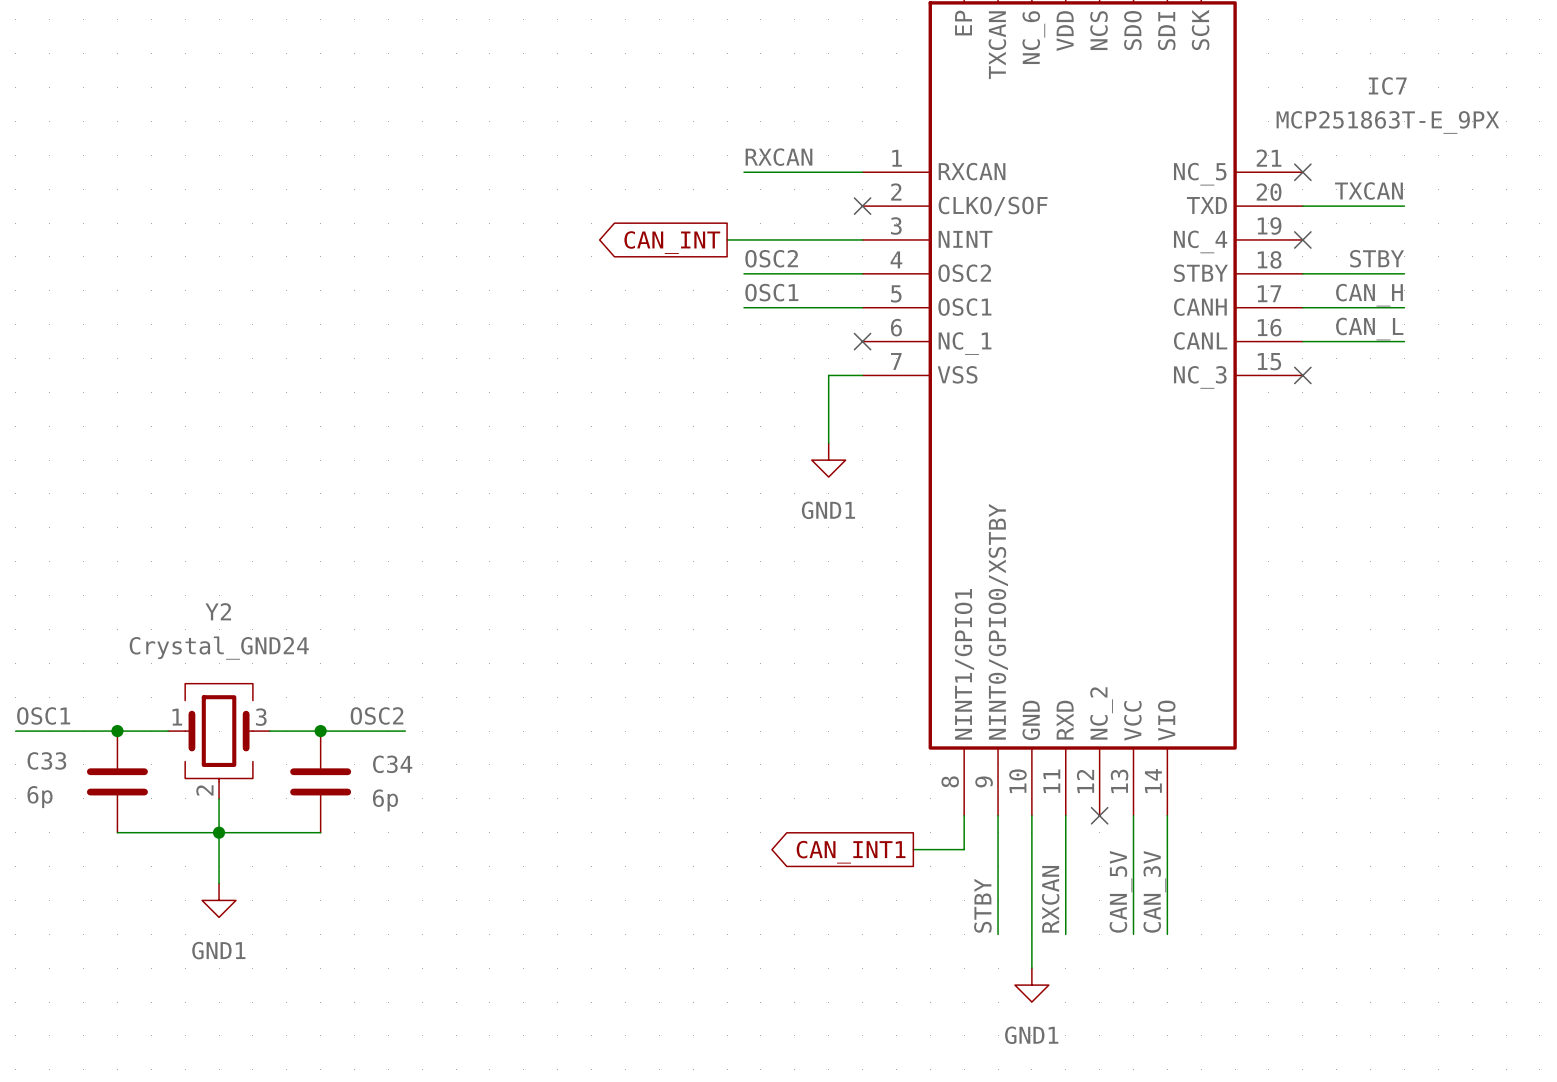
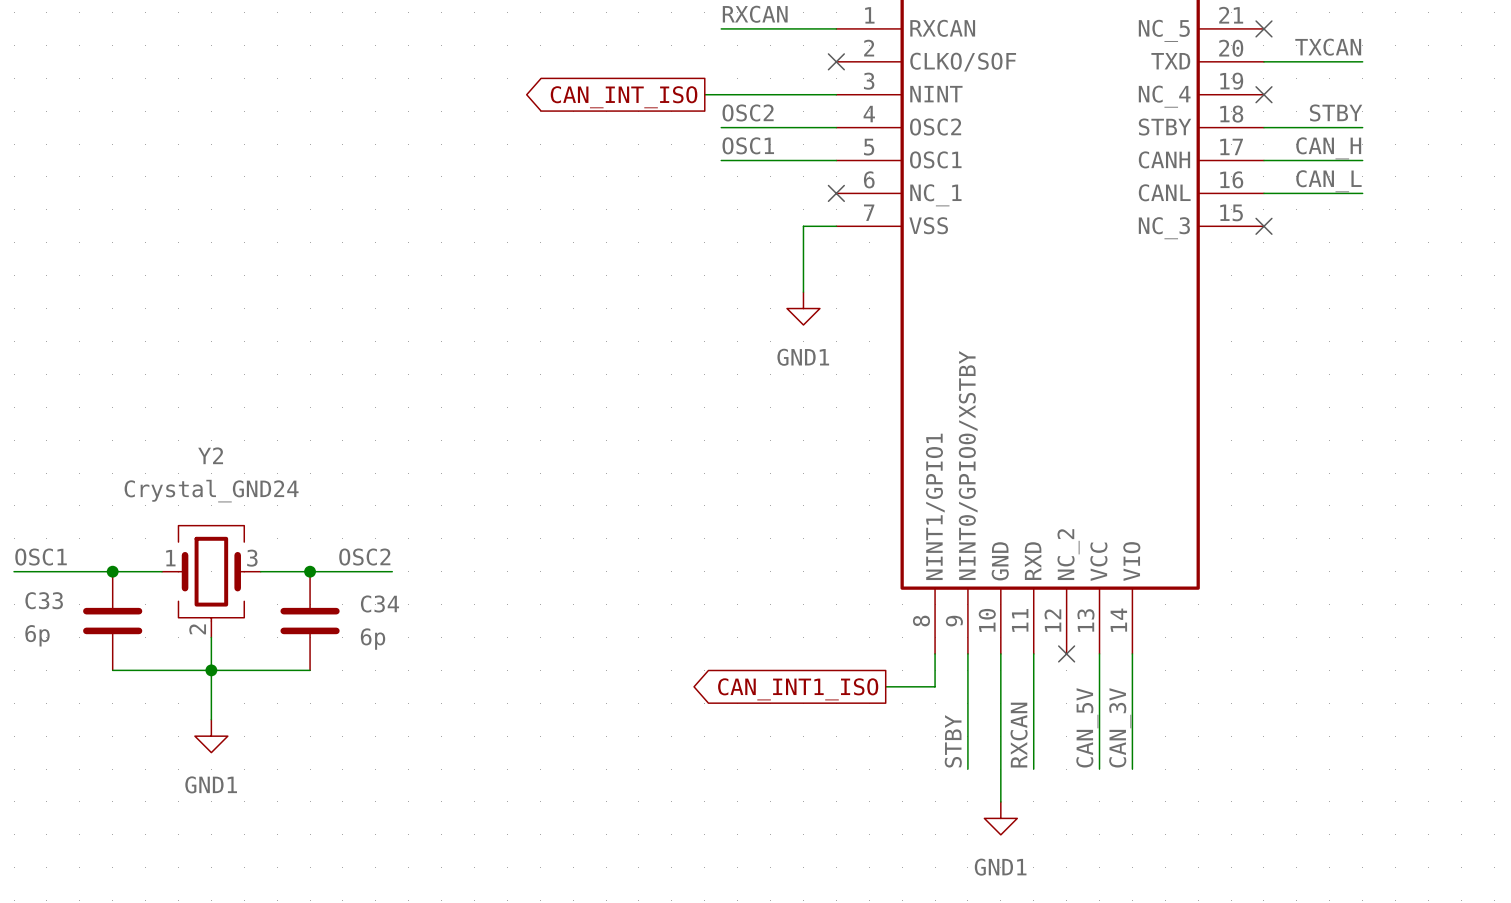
global label: CAN_INT (672, 242) -> CAN_INT_ISO (624, 97)
global label: CAN_INT1 (851, 852) -> CAN_INT1_ISO (798, 689)

